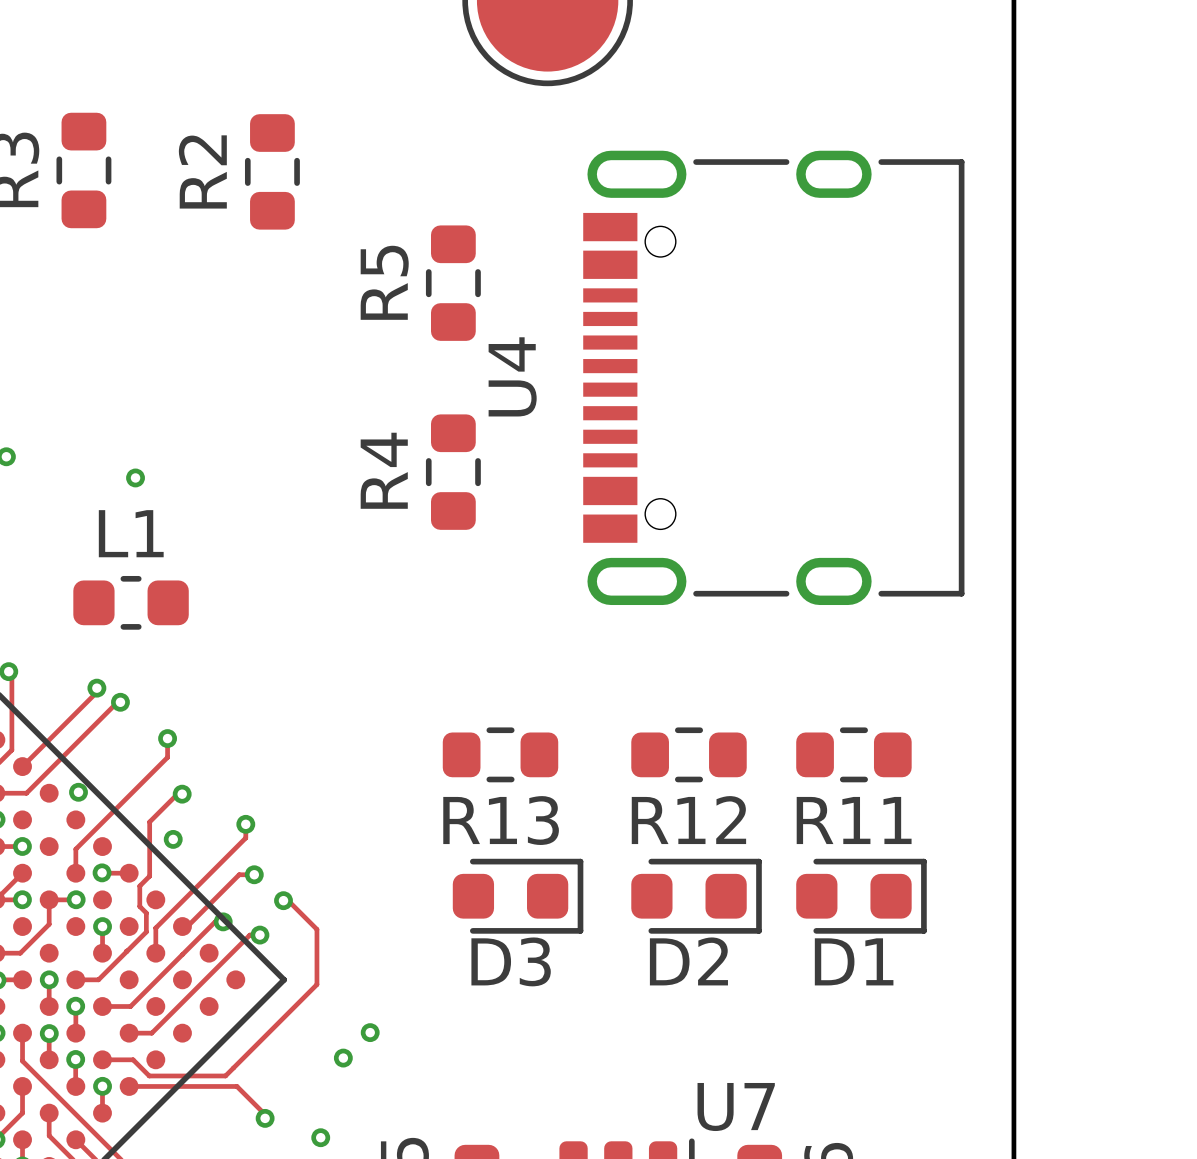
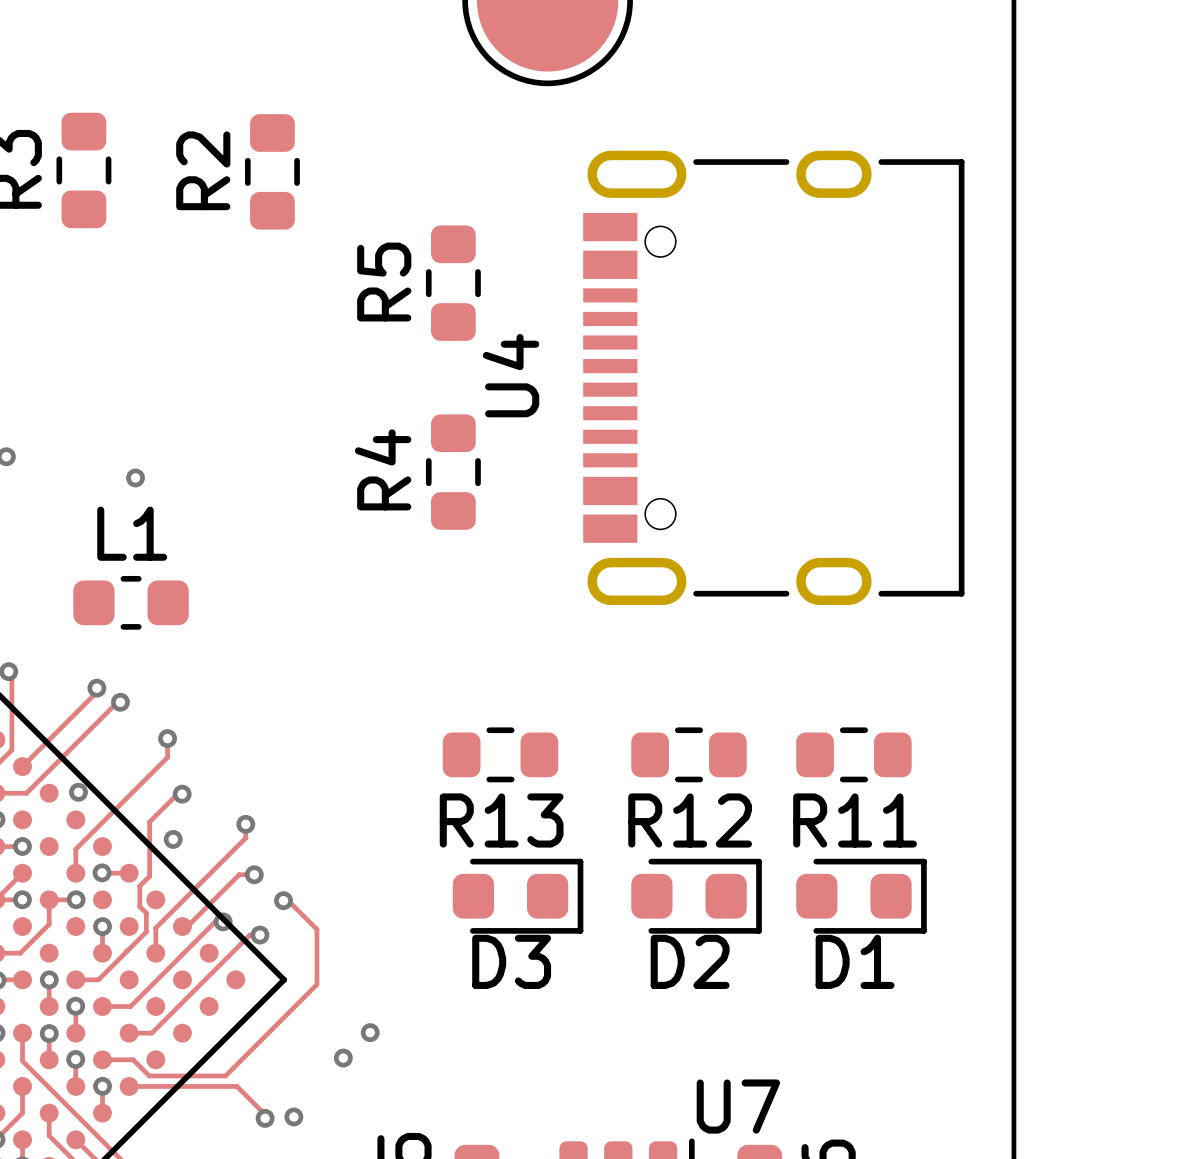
via position: (320, 1137) -> (293, 1116)

